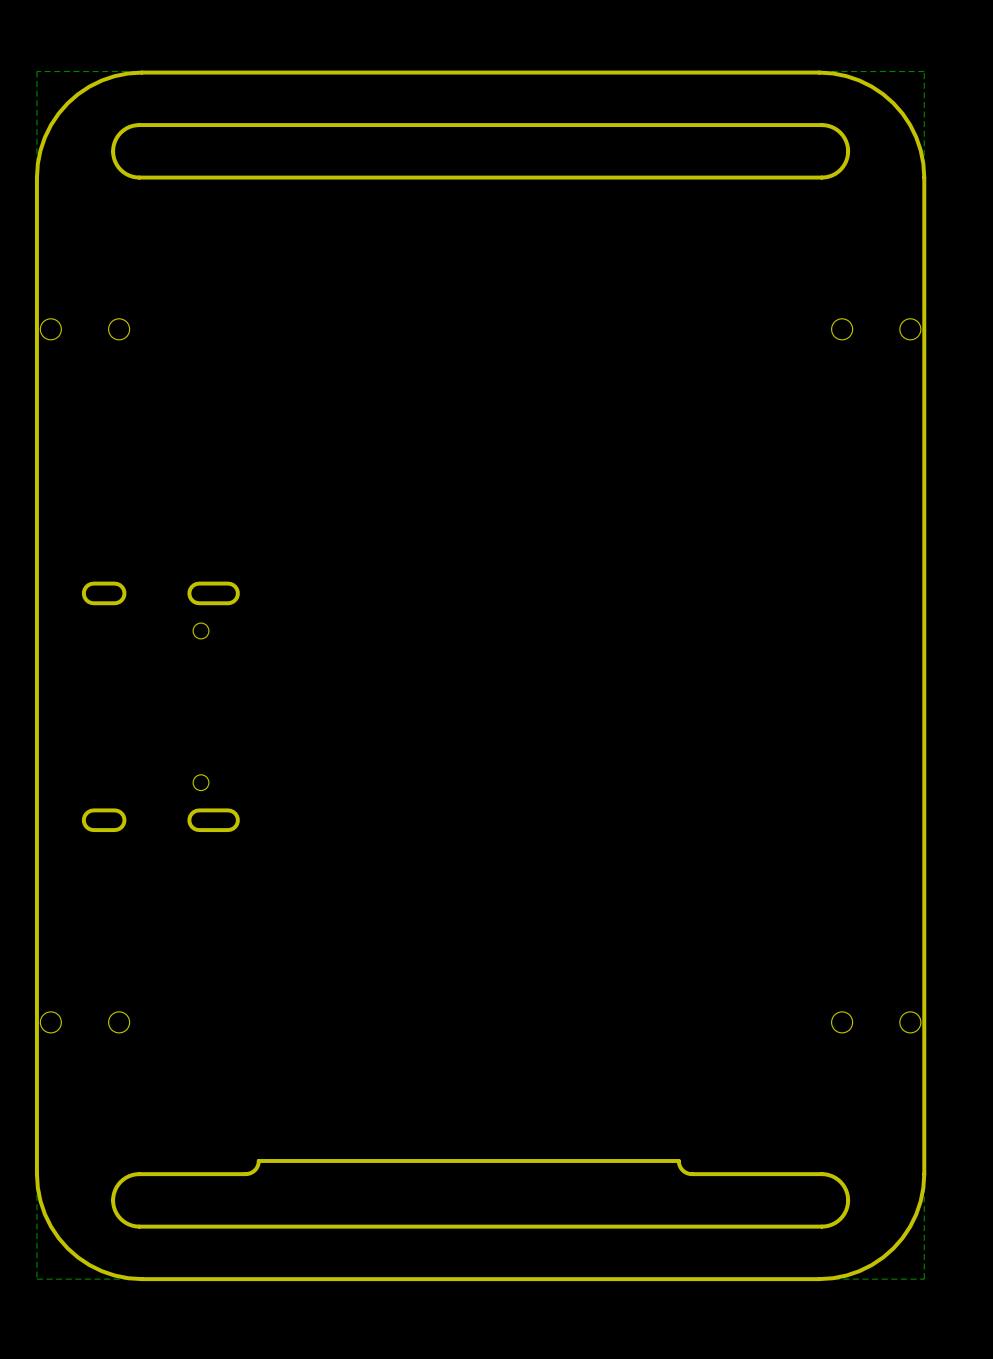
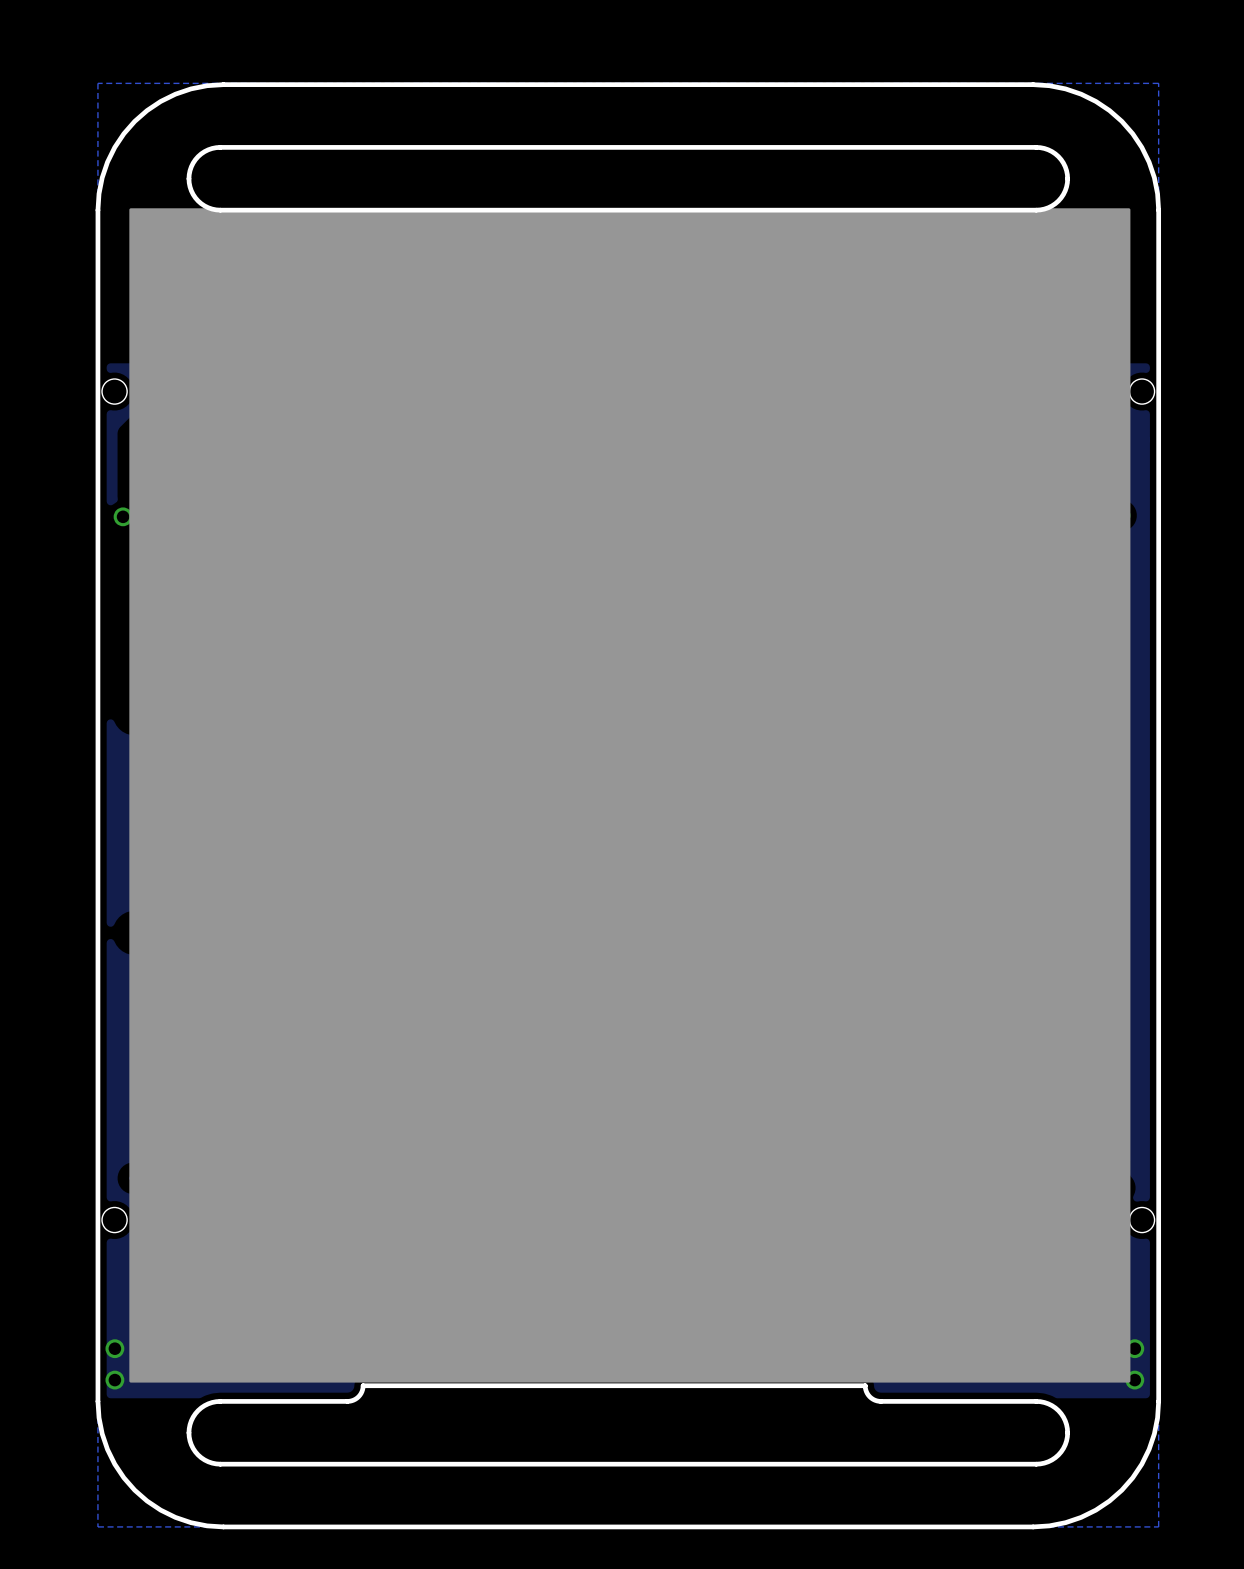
drawing: none -> [129, 208, 1131, 1383]
via: none -> (123, 516)
via: none -> (114, 1348)
via: none -> (1134, 1348)
via: none -> (114, 1380)
via: none -> (1134, 1380)

